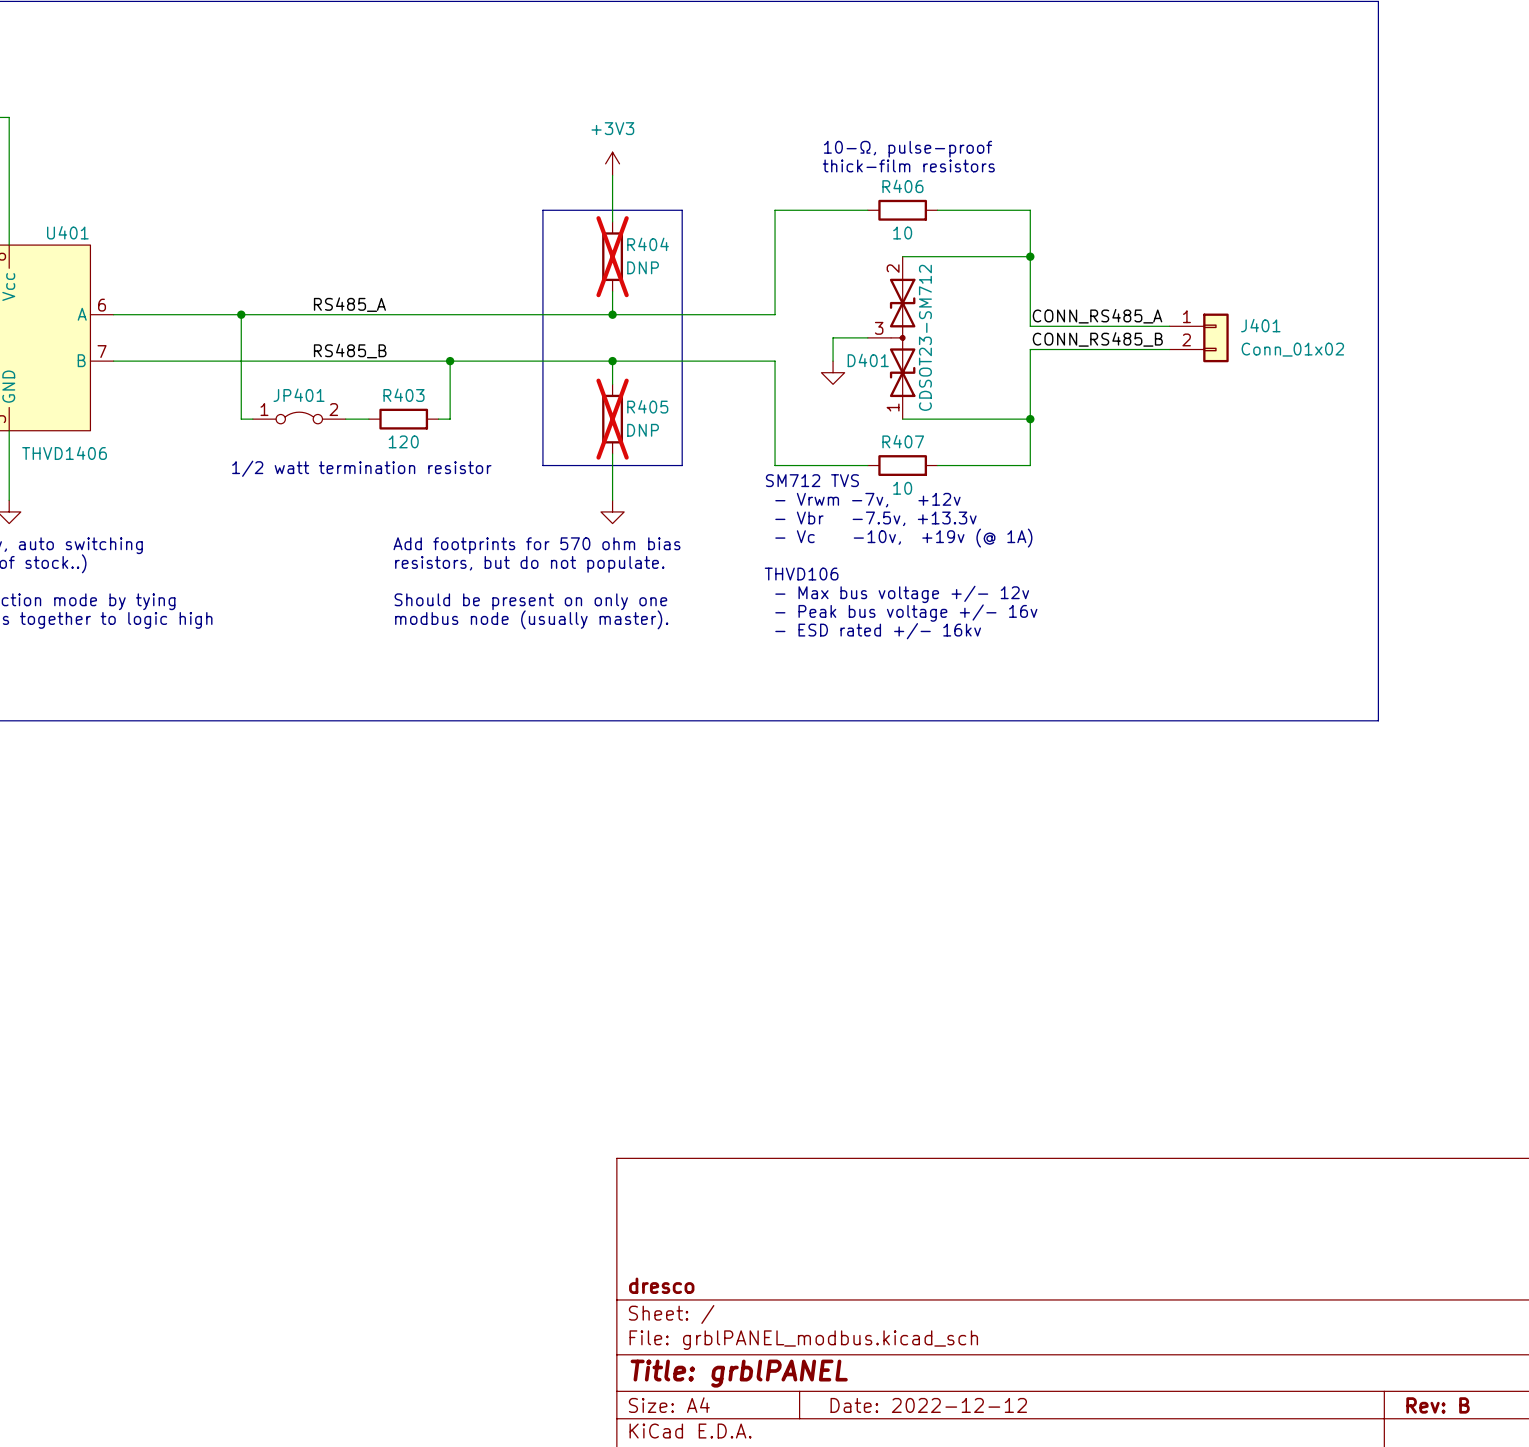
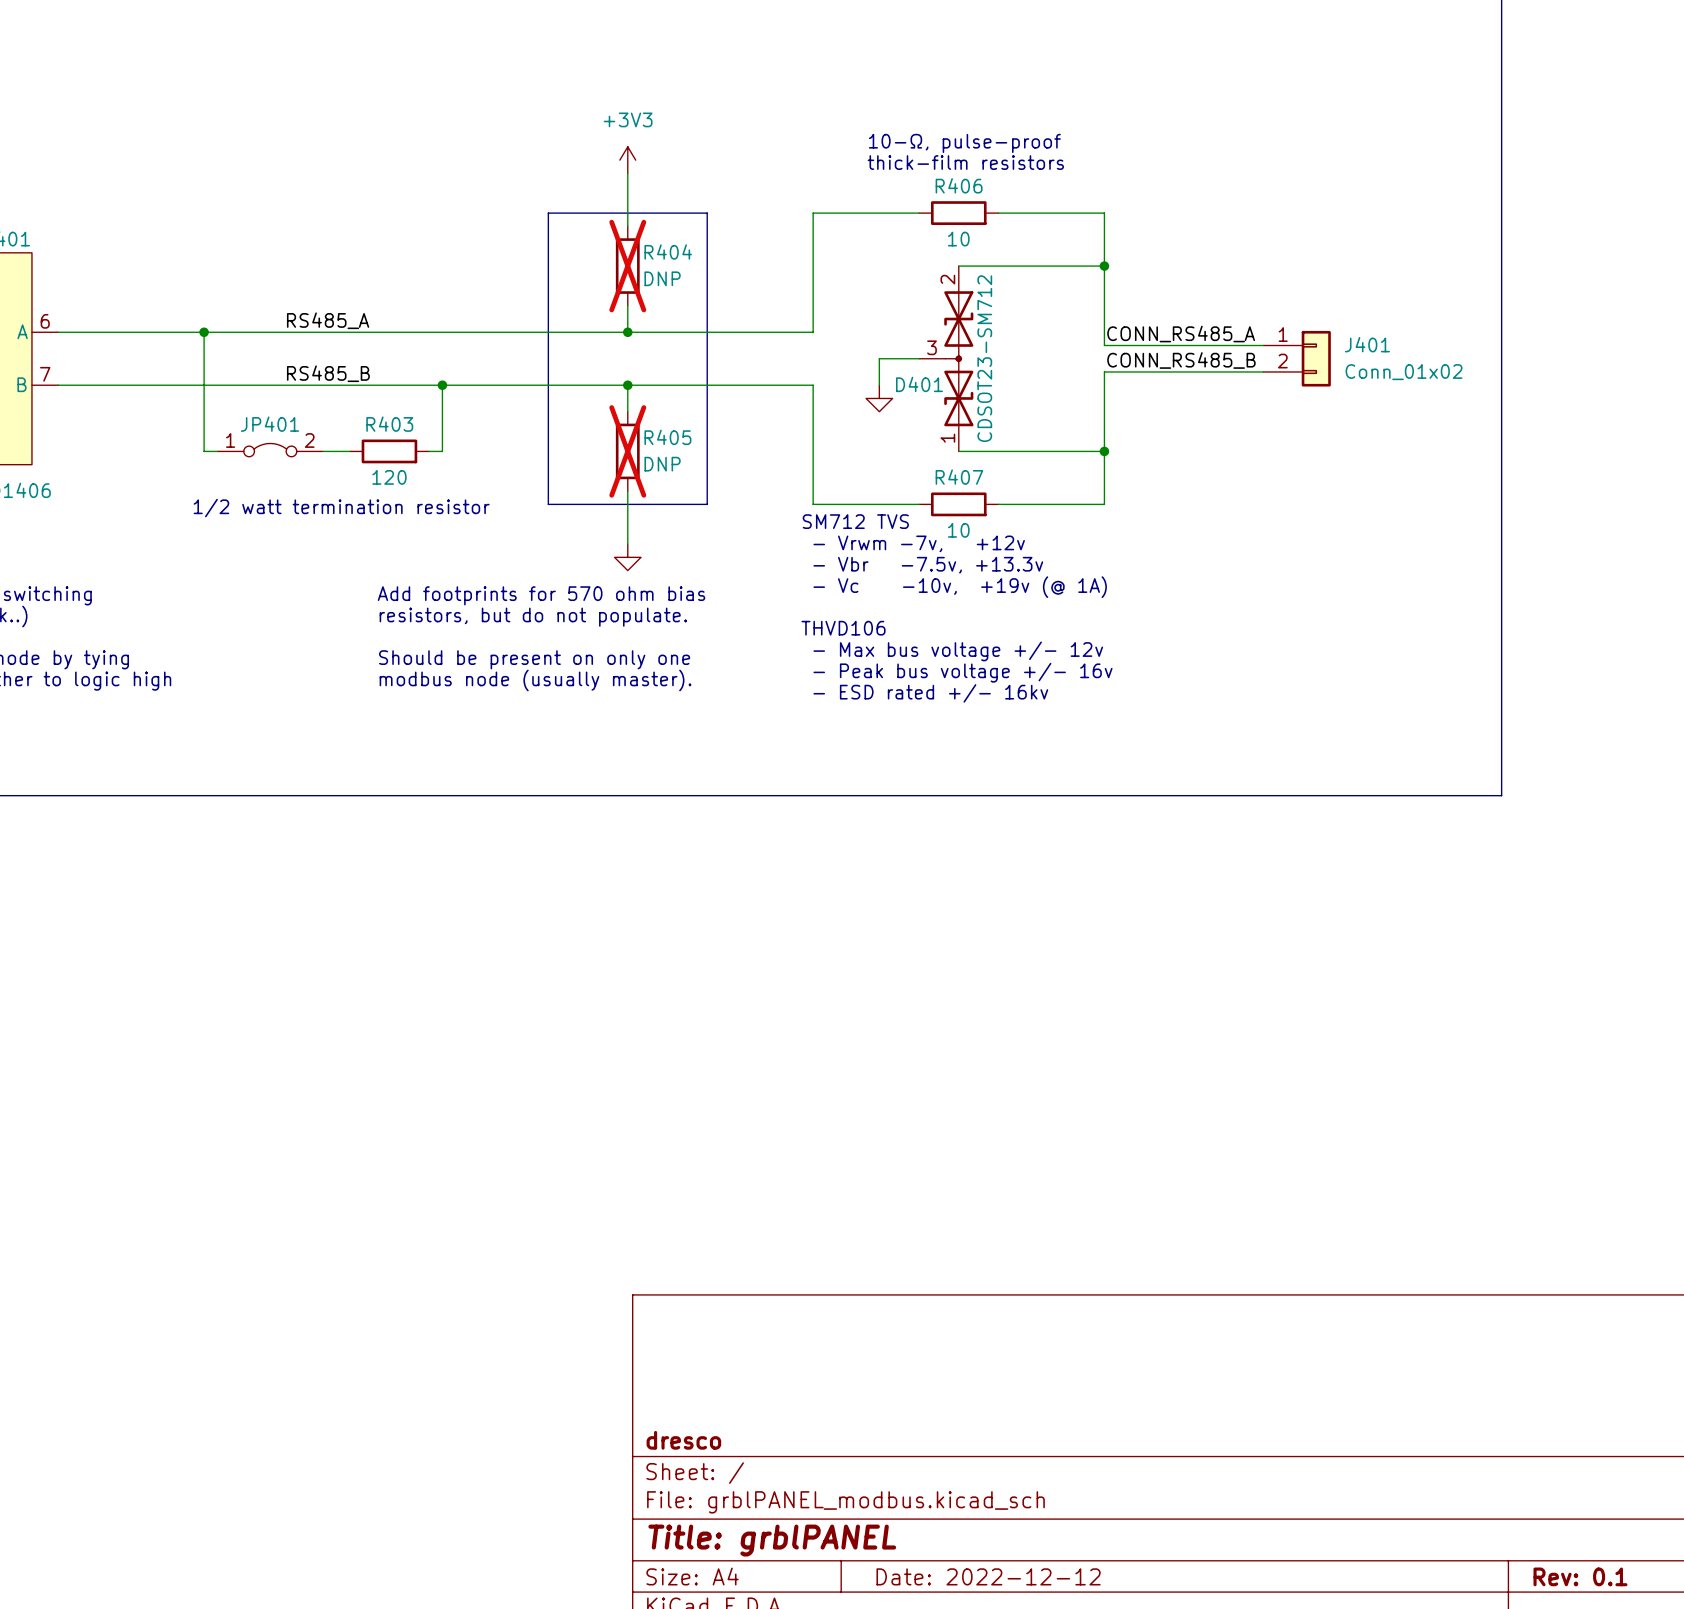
title block: Rev: B (1438, 1405) -> Rev: 0.1 (1580, 1576)

